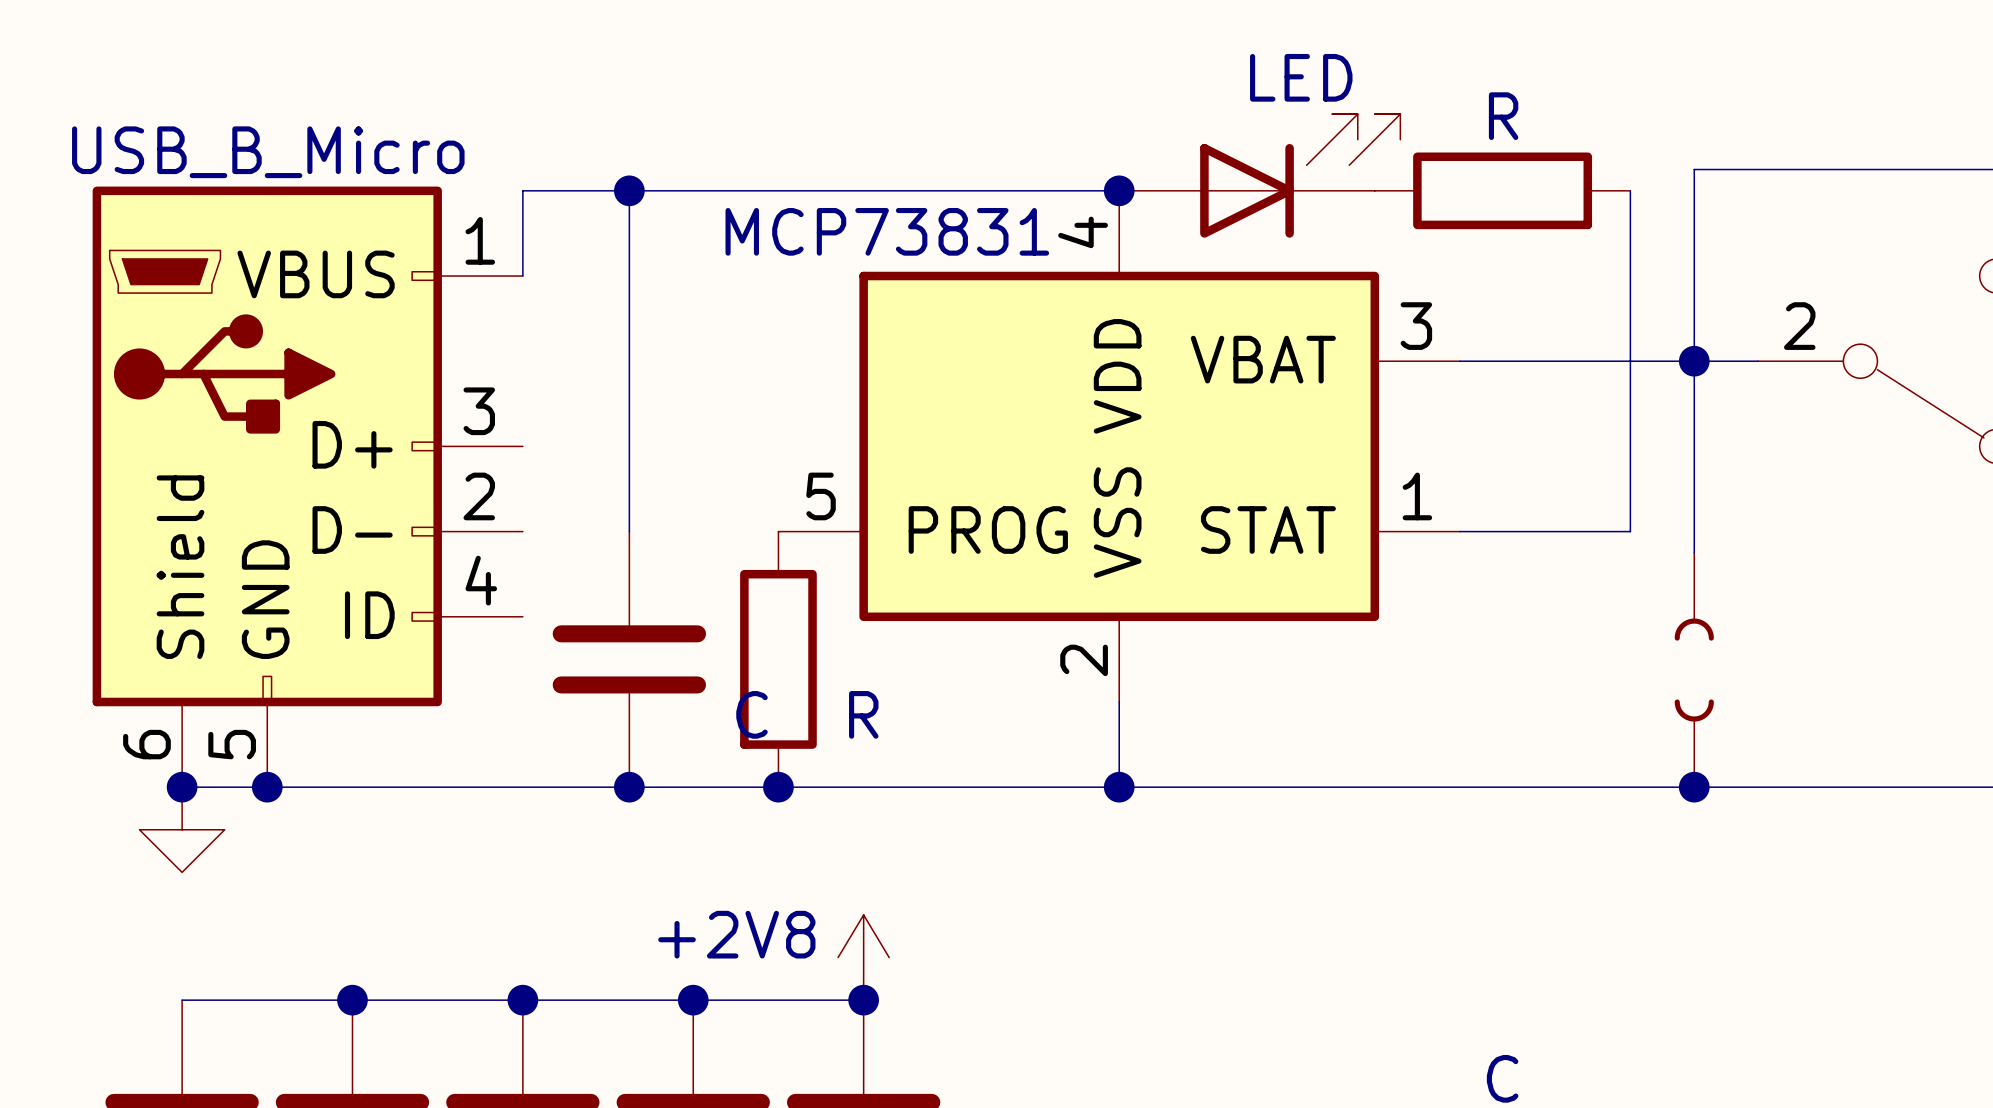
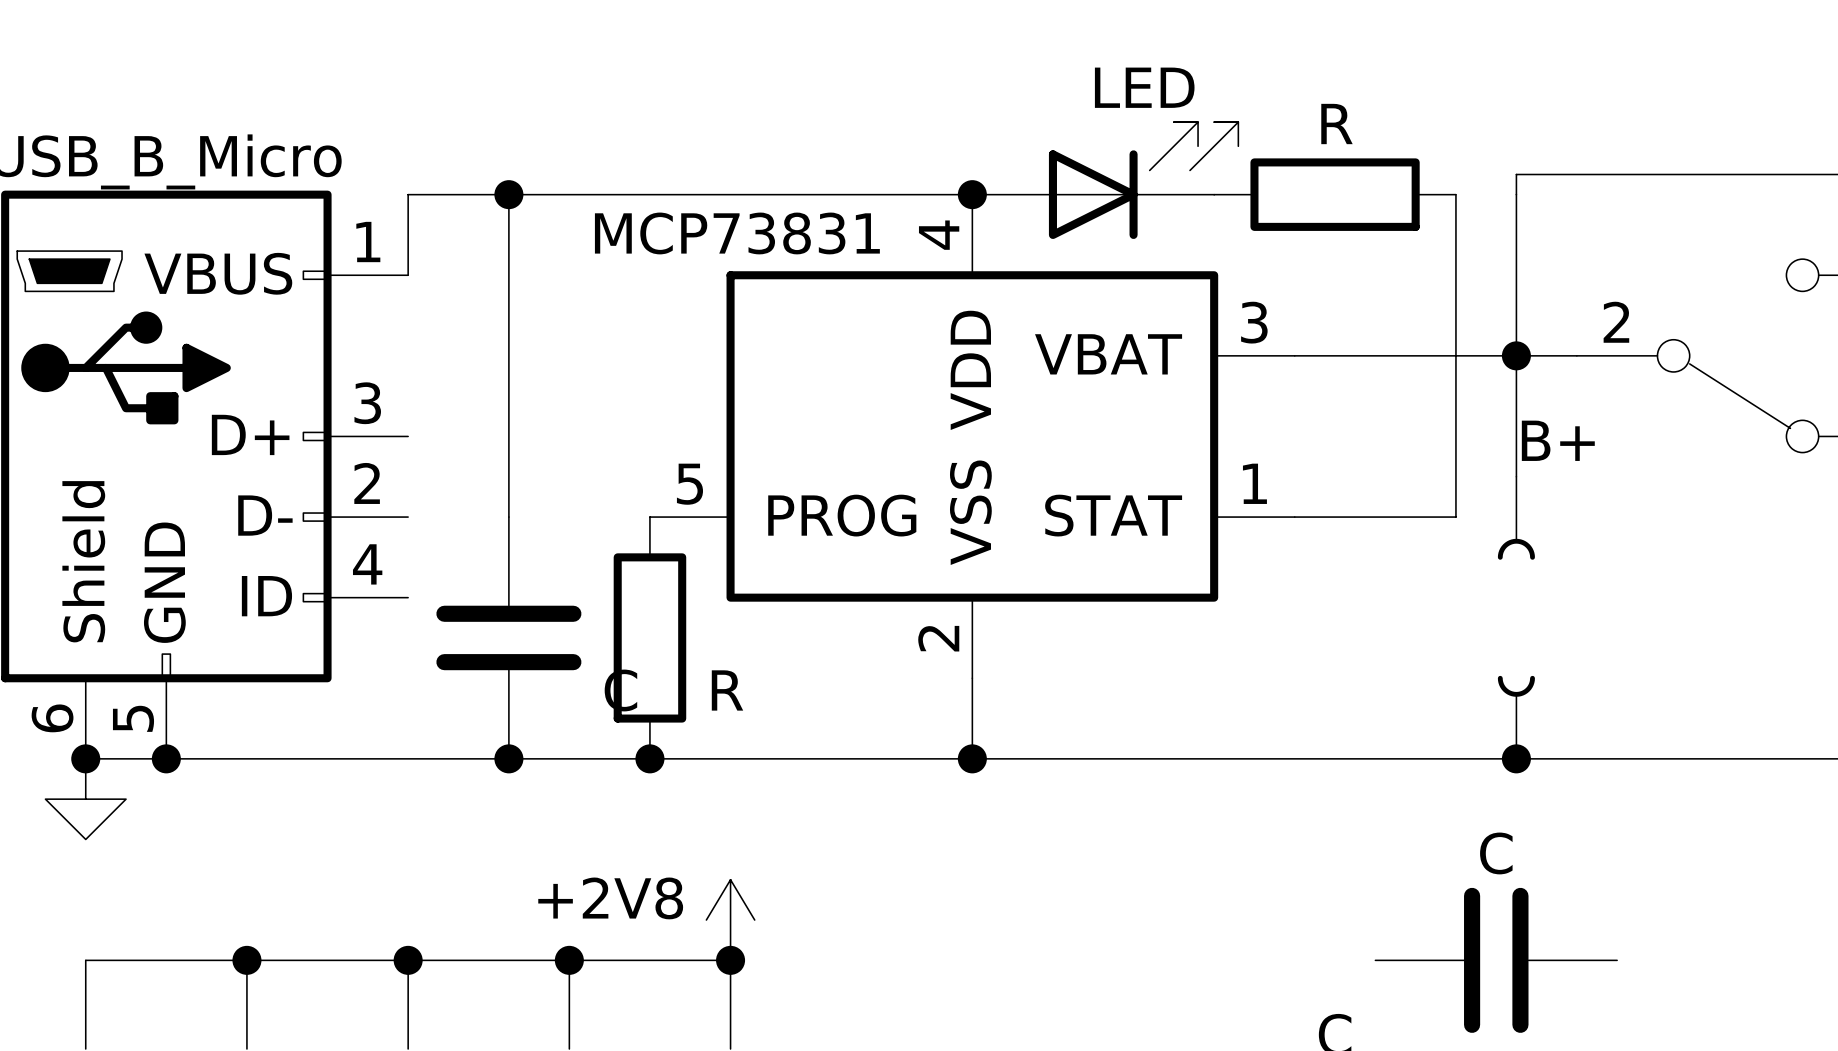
label: none -> B+ (1558, 440)
part position: (1694, 596) -> (1516, 518)
part: none -> C (1496, 960)

